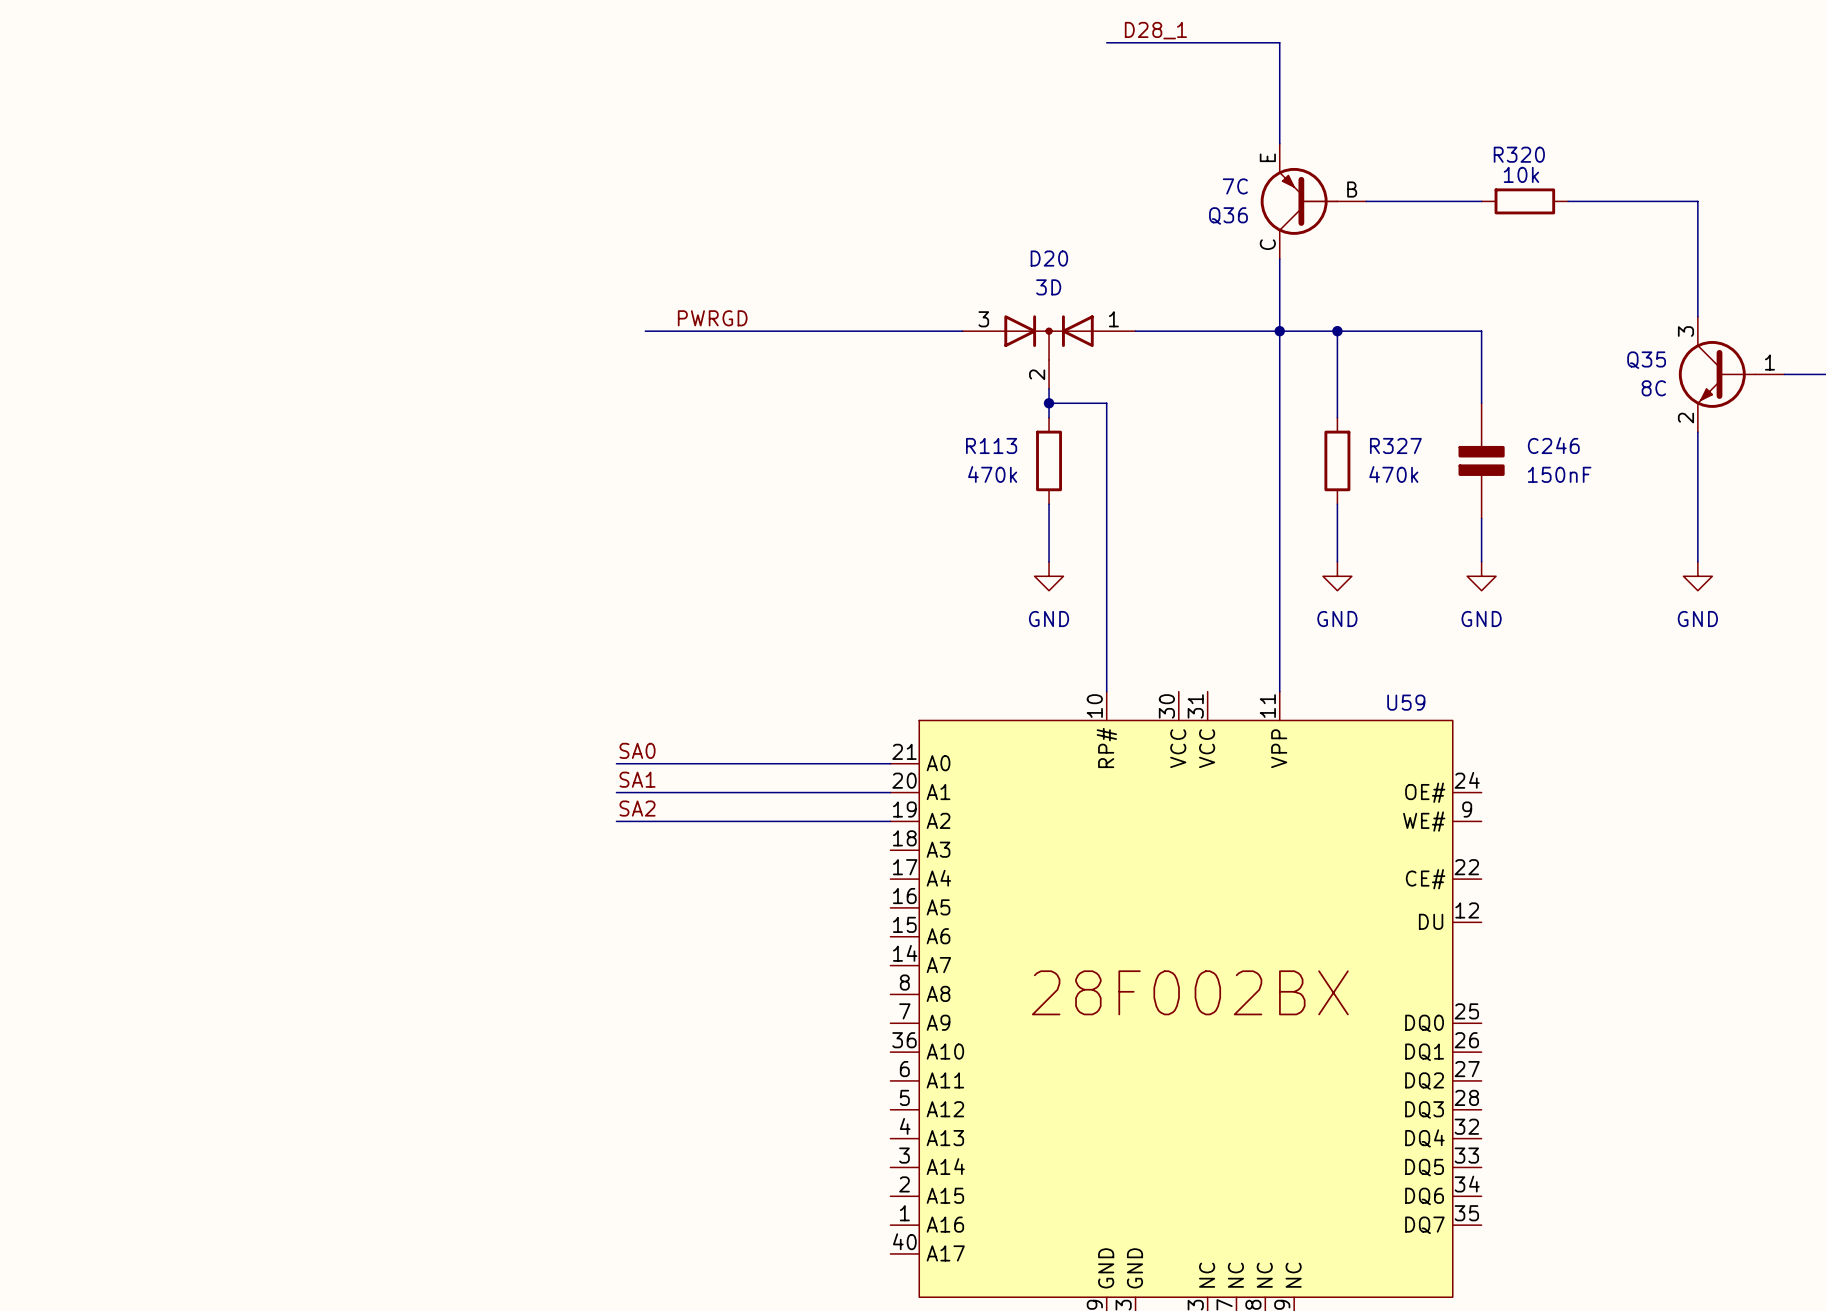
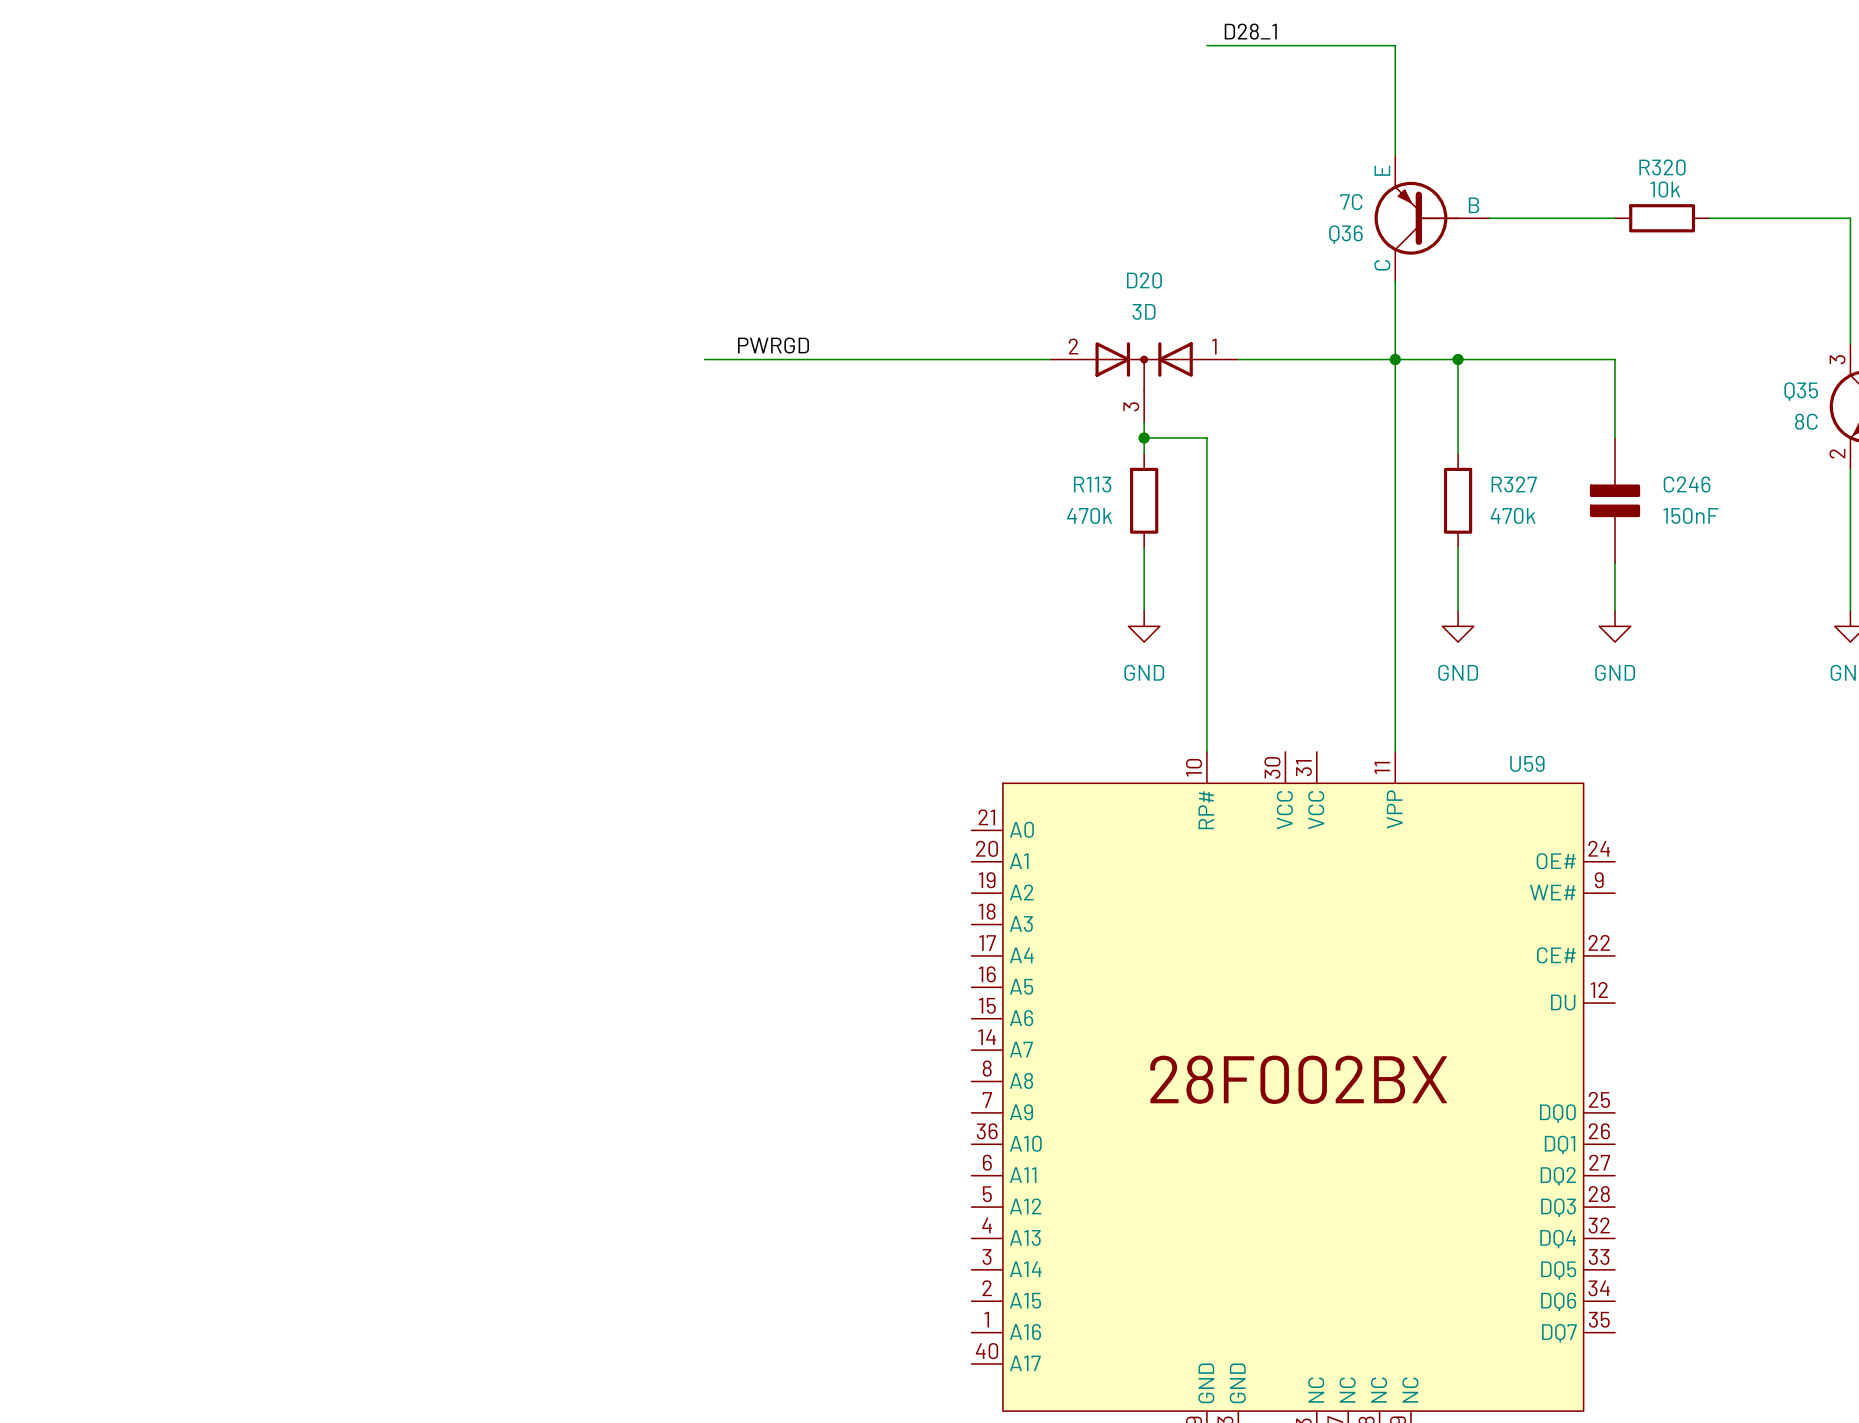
D20 pin number: 3 (983, 319) -> 2 (1073, 346)
D20 pin number: 2 (1037, 374) -> 3 (1131, 406)
label: SA0 (637, 750) -> none
wire: (616, 763) (890, 763) -> none
label: SA1 (637, 779) -> none
wire: (616, 792) (890, 792) -> none
label: SA2 (637, 808) -> none
wire: (616, 821) (890, 821) -> none

